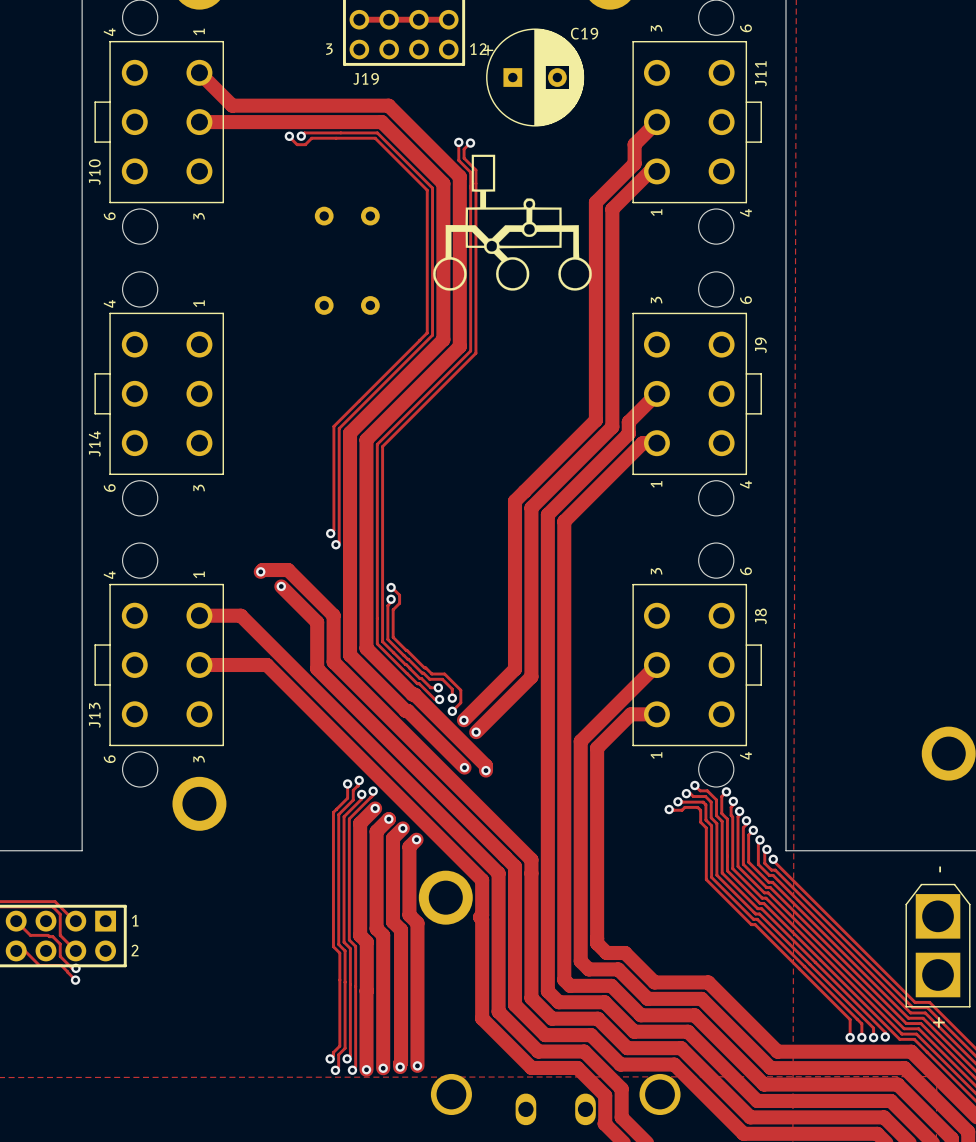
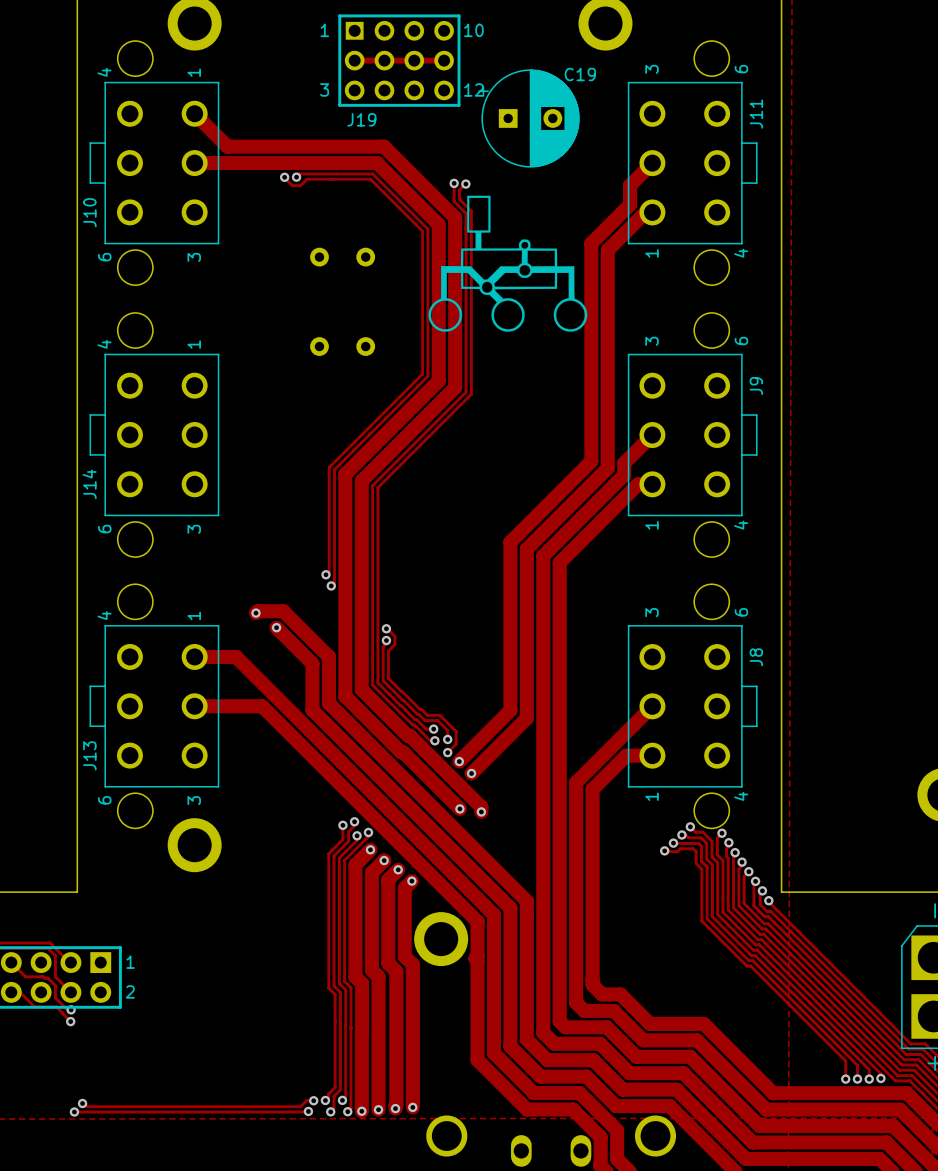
track: none -> (313, 1100) (306, 1100) (300, 1106) (87, 1106) (82, 1103)
via: none -> (313, 1100)
via: none -> (82, 1103)
track: none -> (308, 1111) (74, 1112)
via: none -> (308, 1111)
via: none -> (74, 1112)

